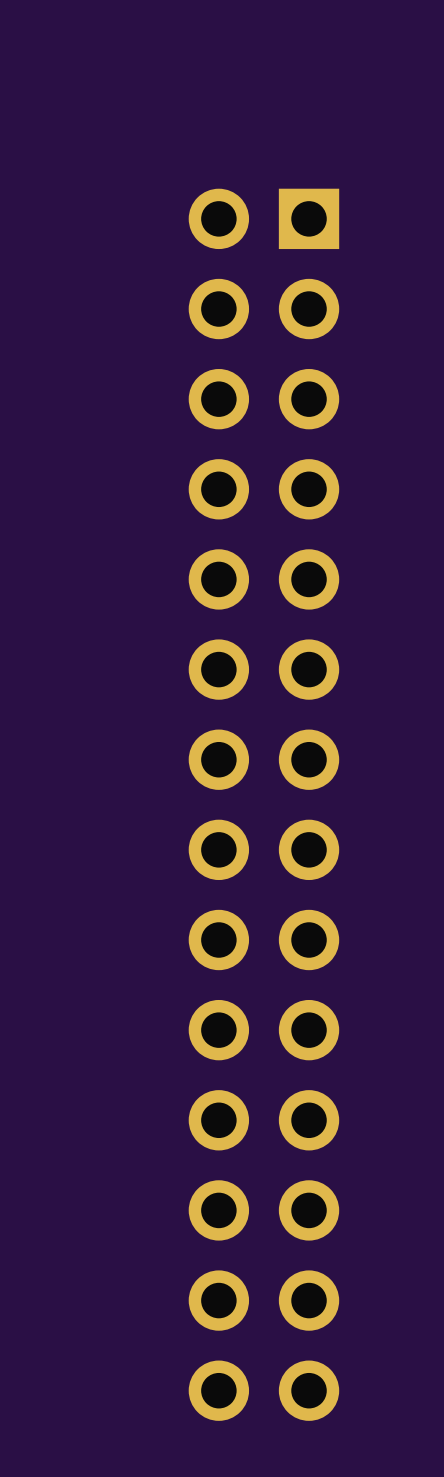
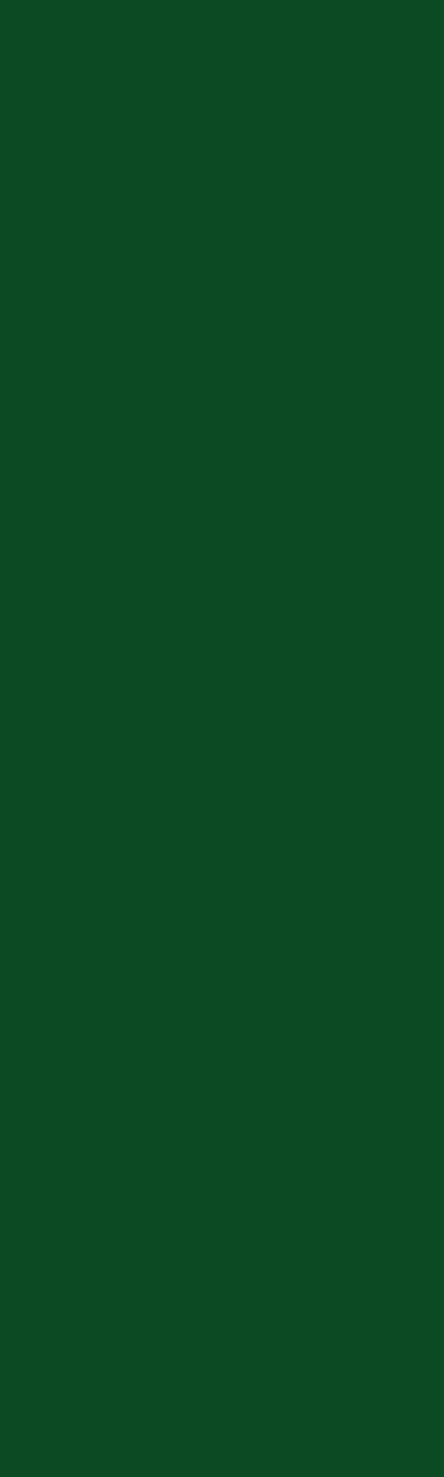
part: (263, 804) -> none

